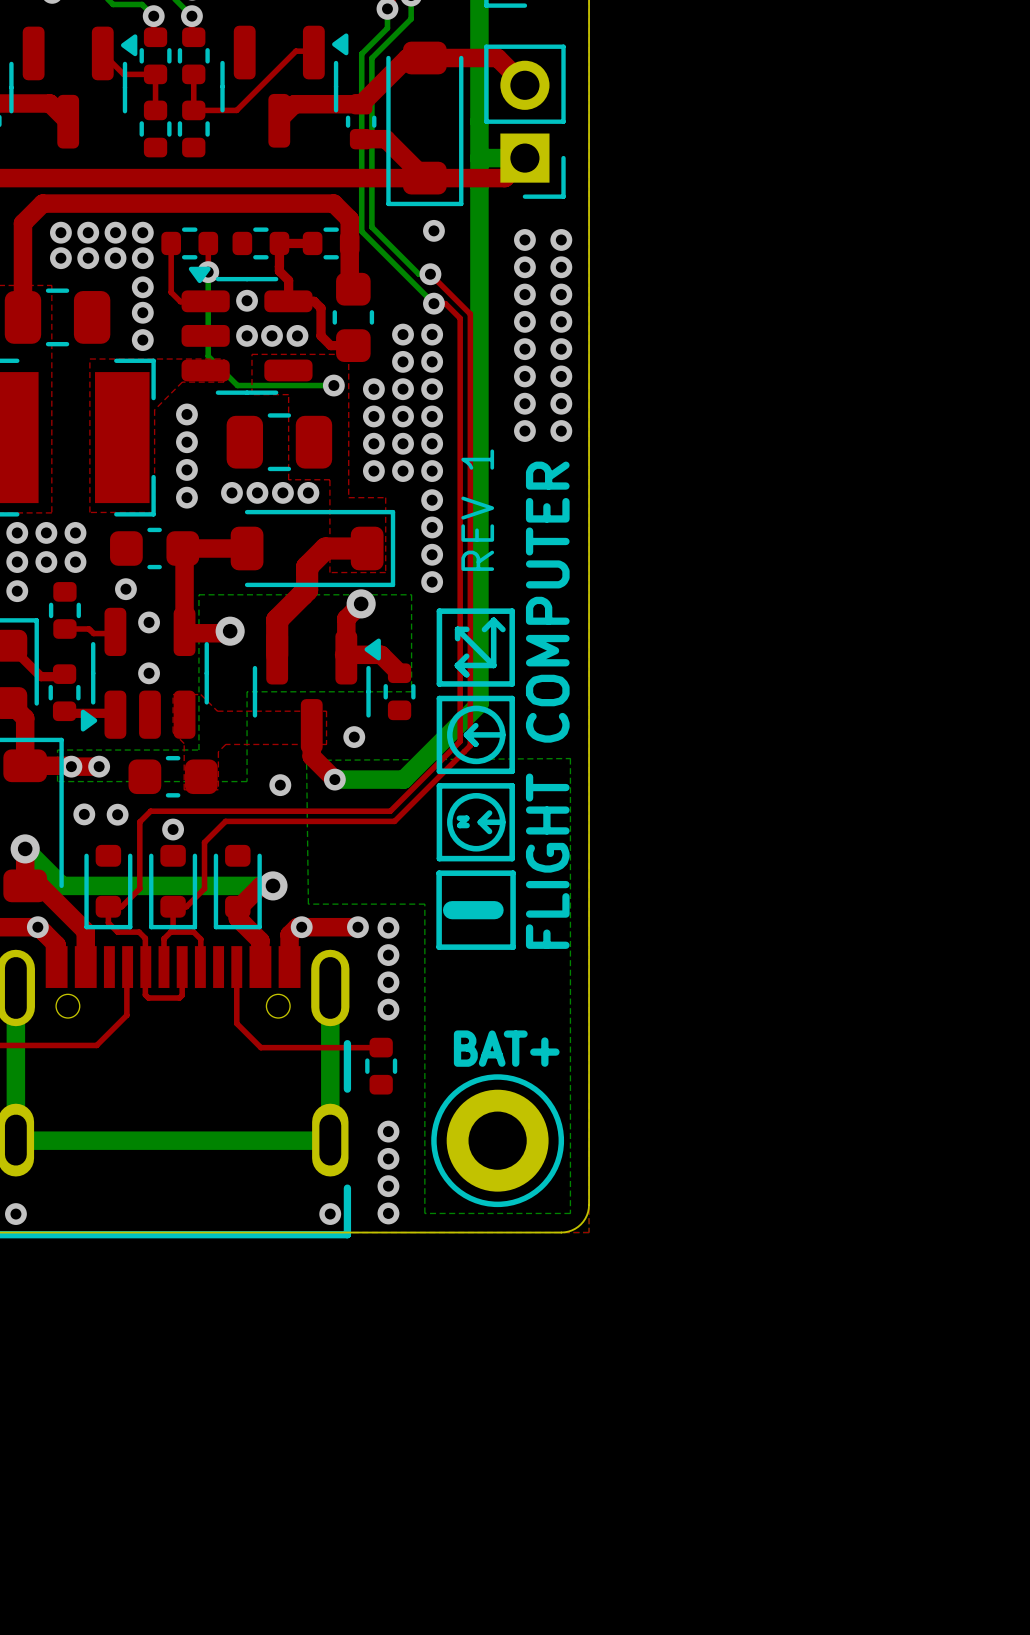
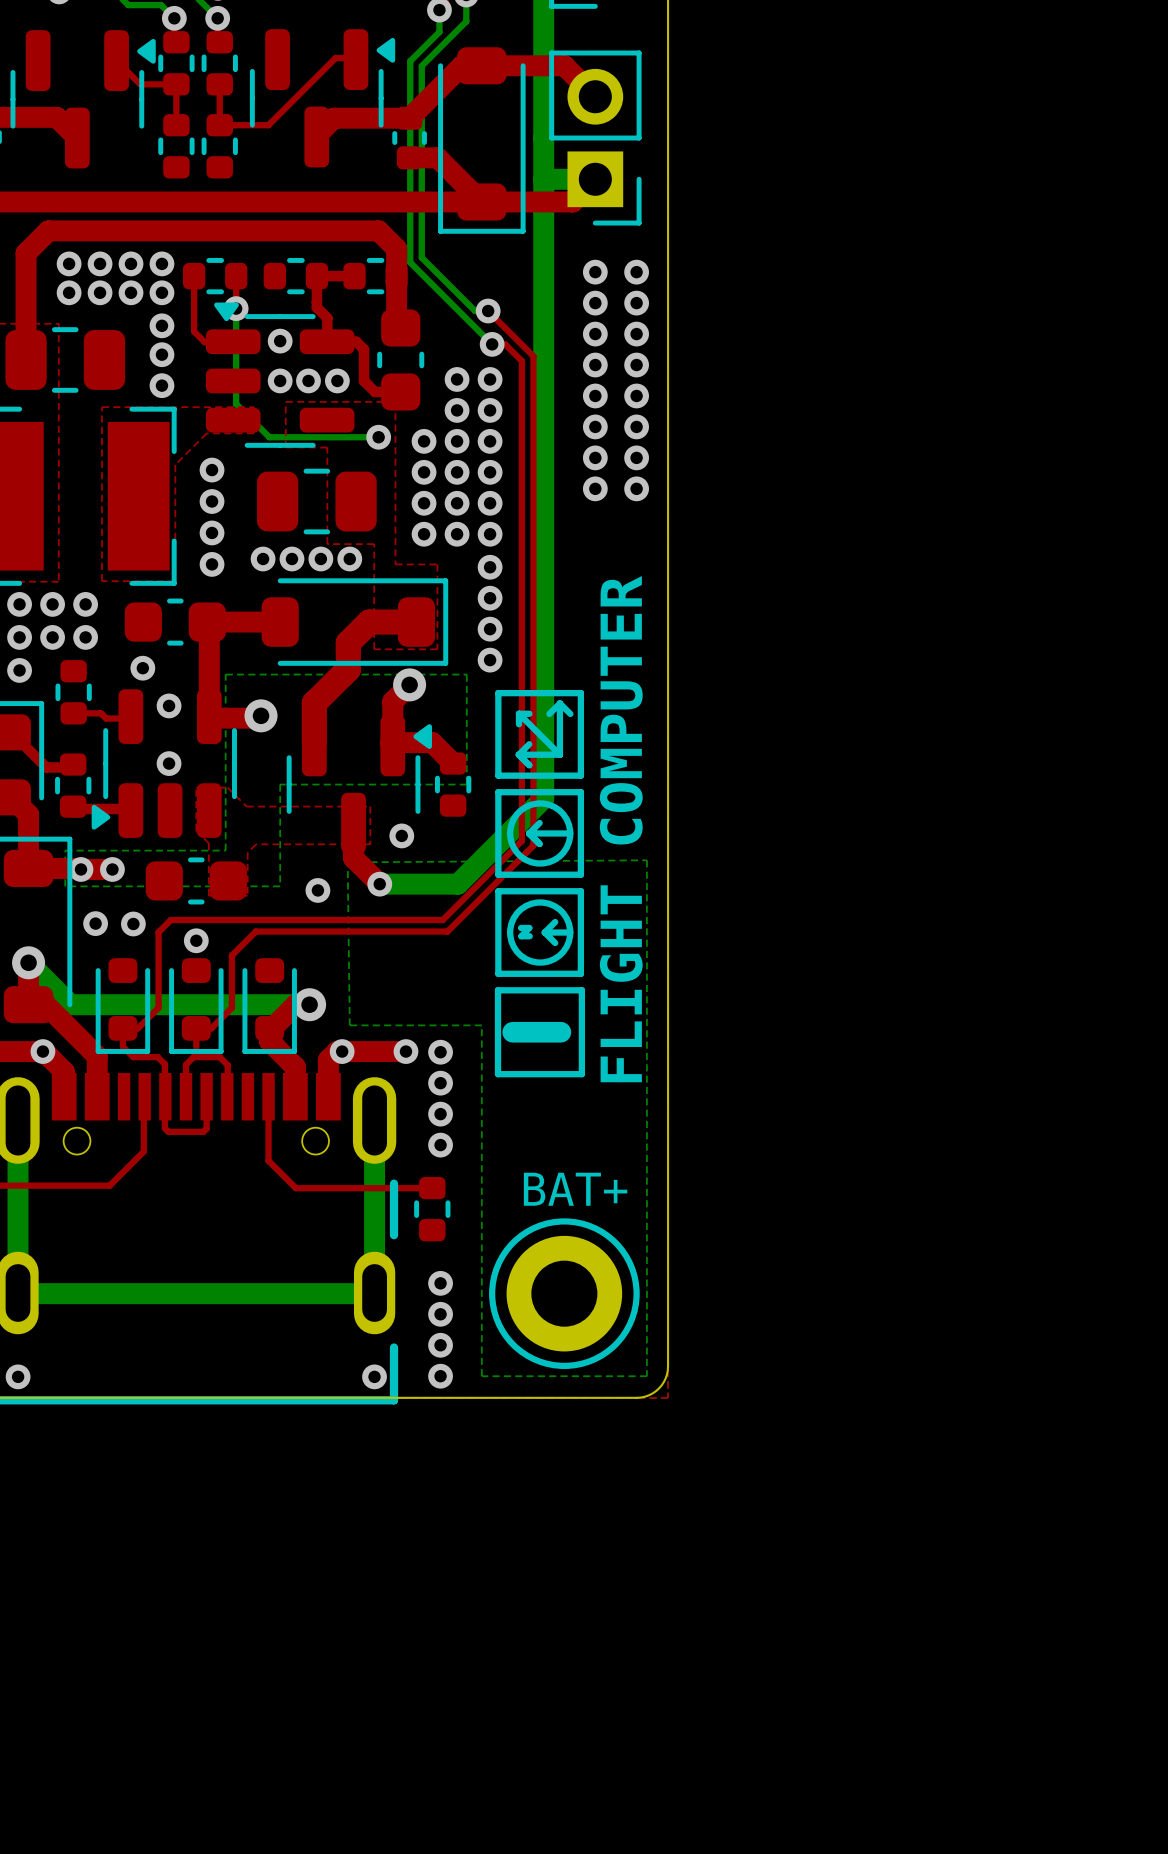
via: (433, 230) -> none
text: REV 1 (477, 510) -> none

